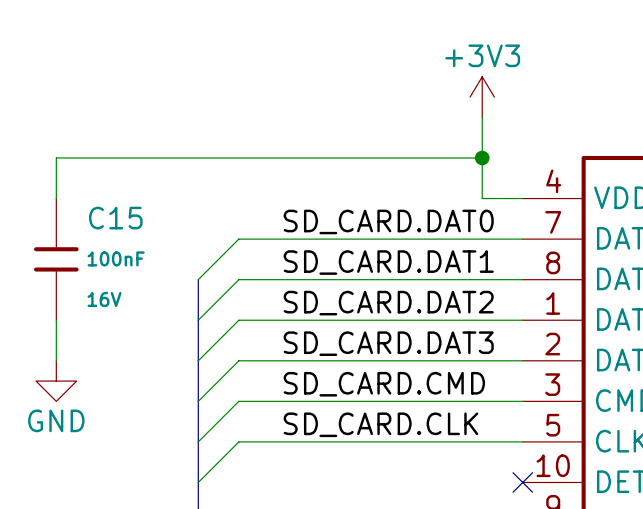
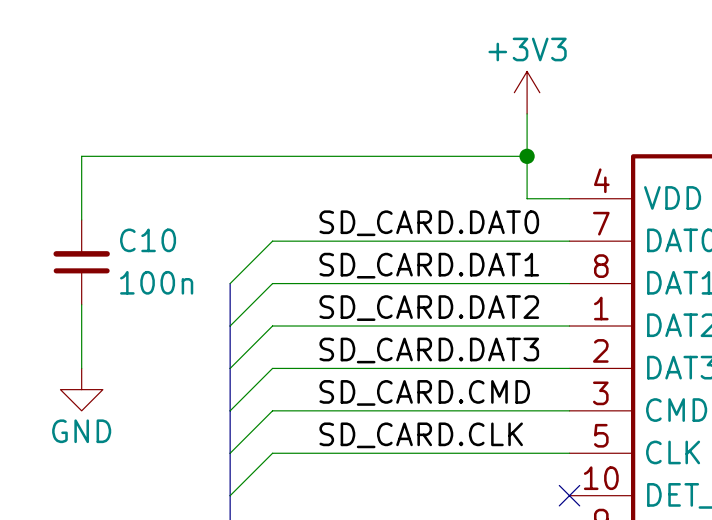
C15: 100nF (56, 259) -> none
C10: none -> (81, 262)

